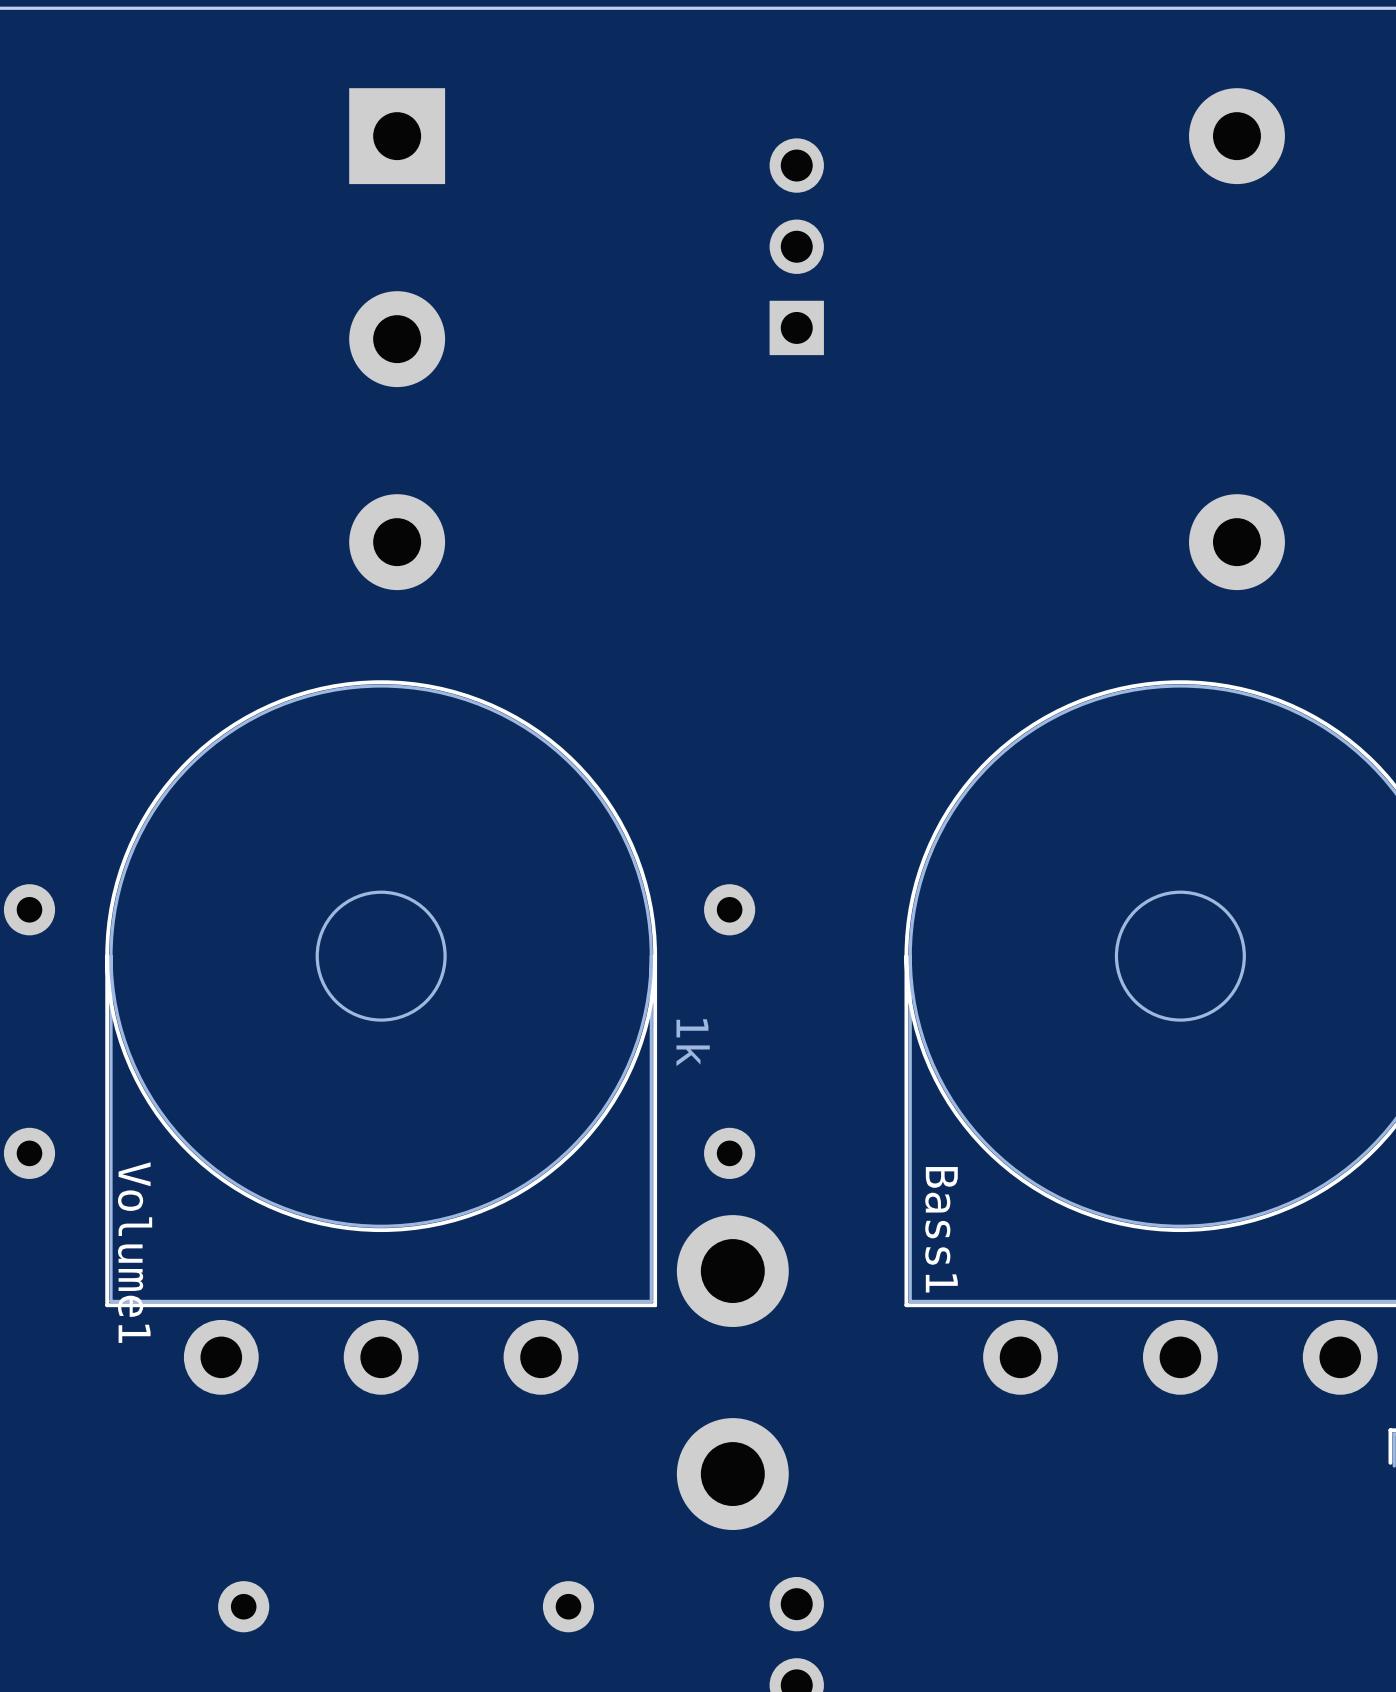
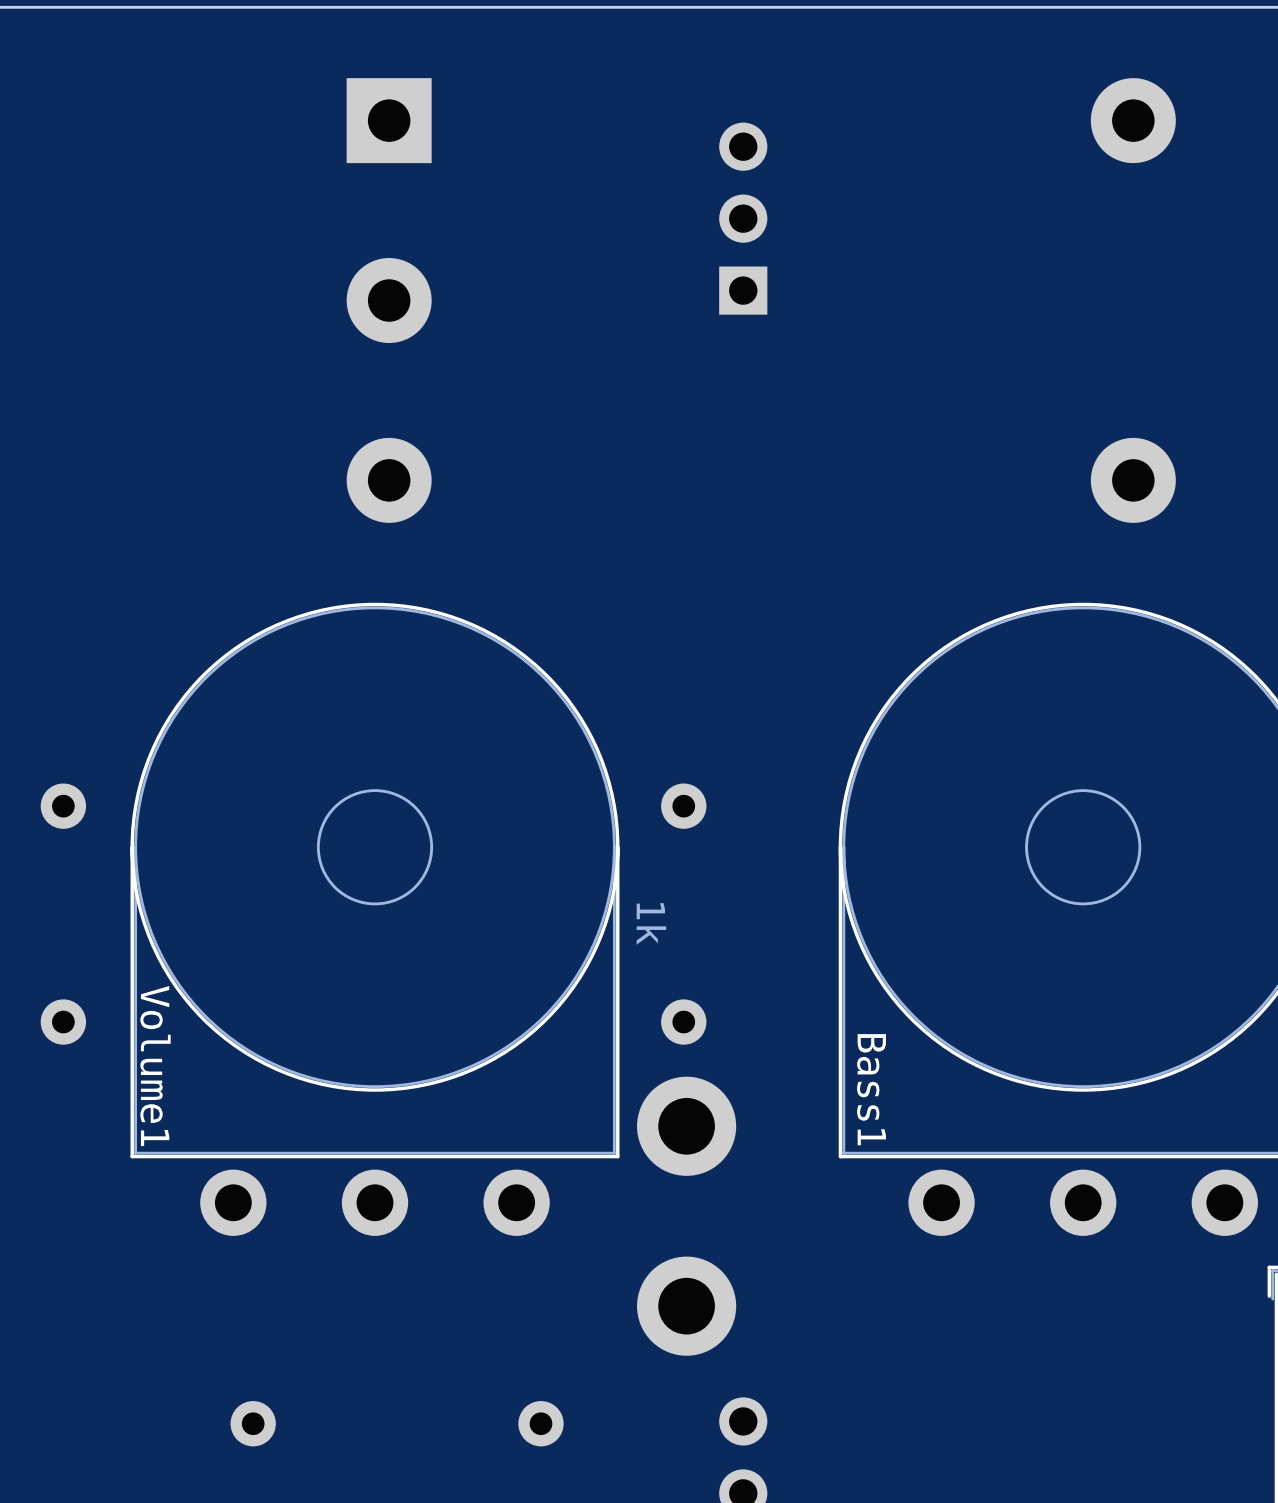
Volume1 name position: Volume1 (135, 1252) -> Volume1 (155, 1066)

